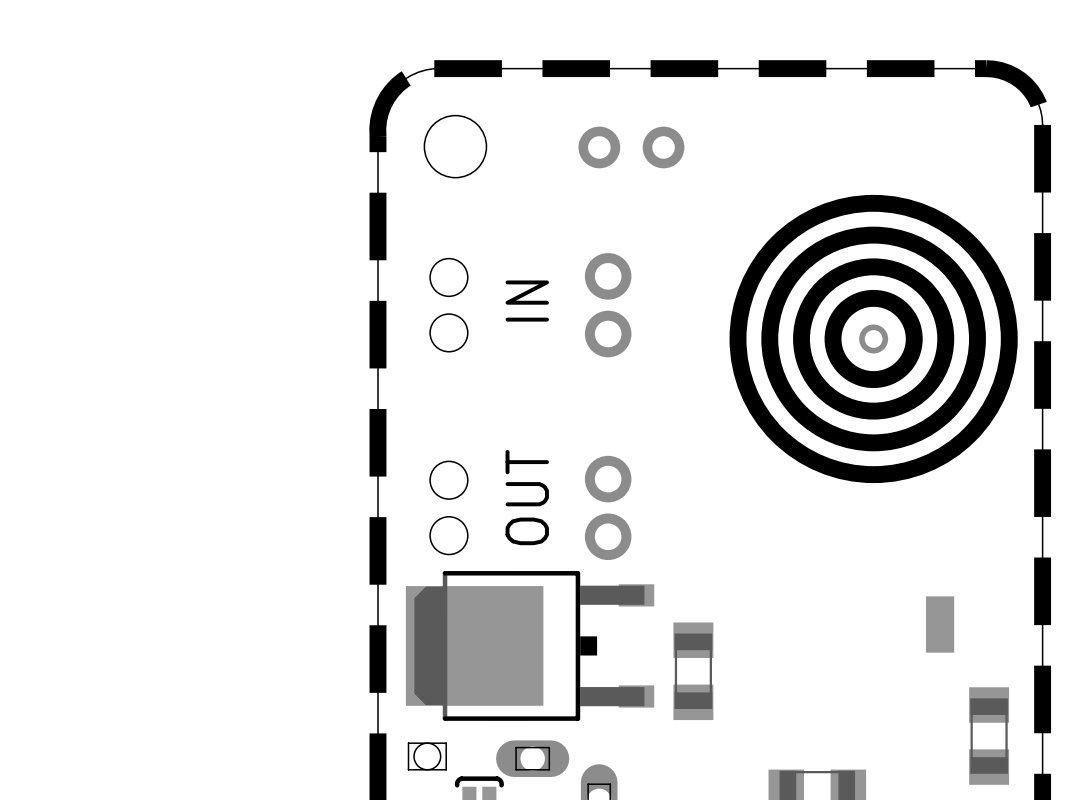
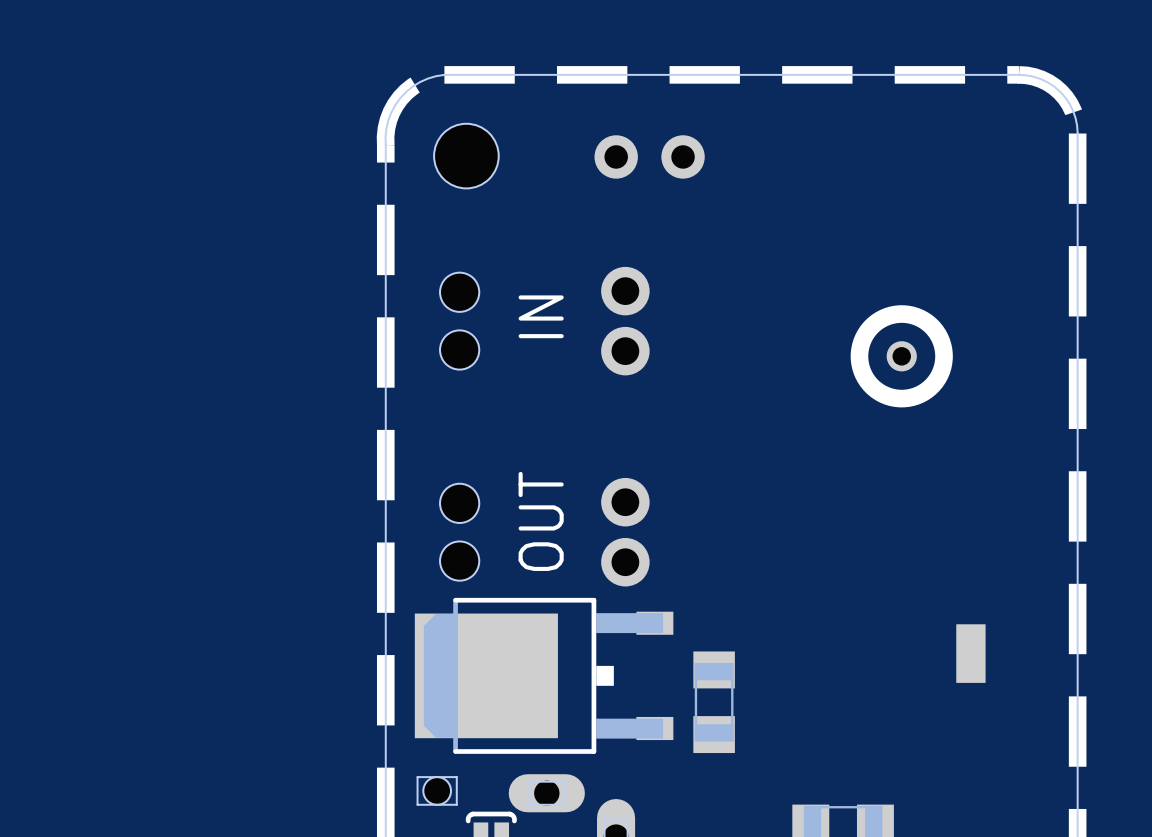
drawing: [729, 194, 1018, 484] -> none
part: (989, 736) -> none

